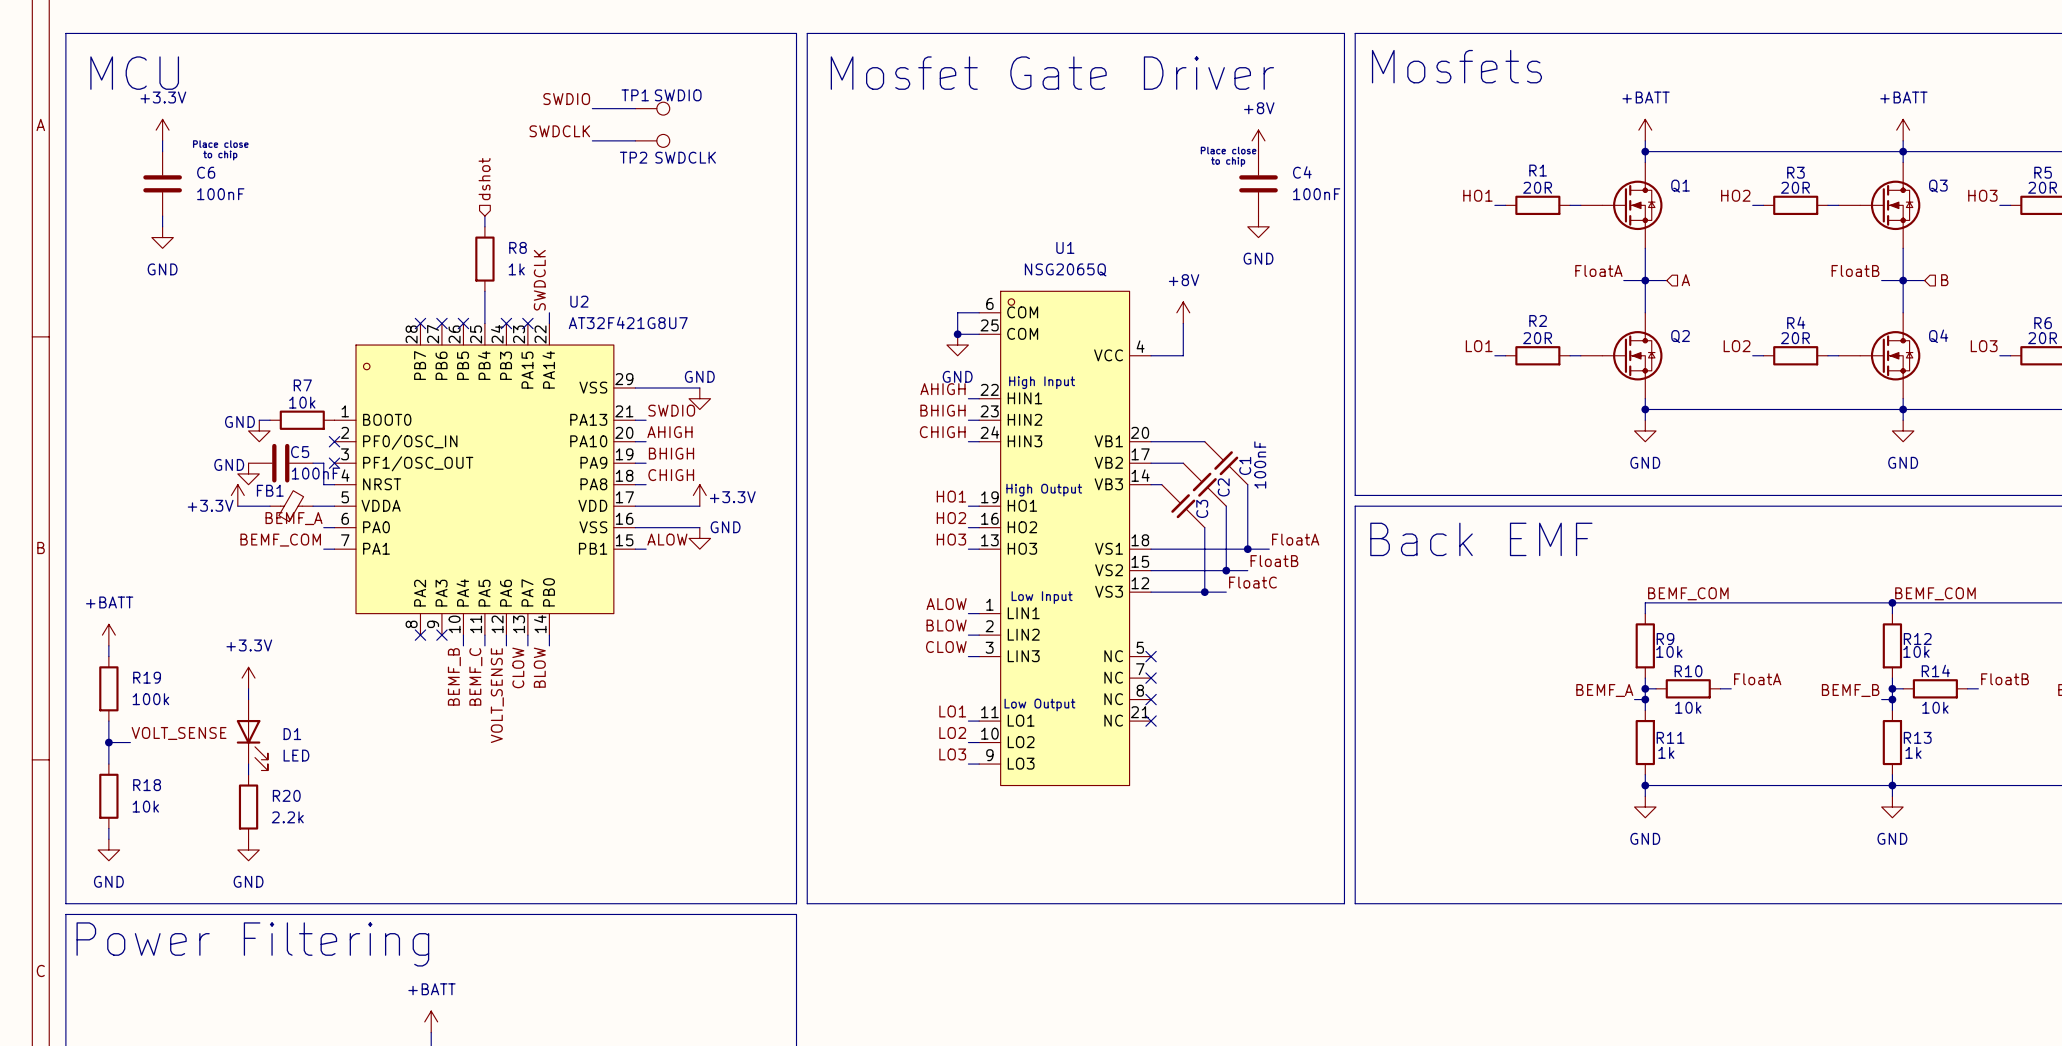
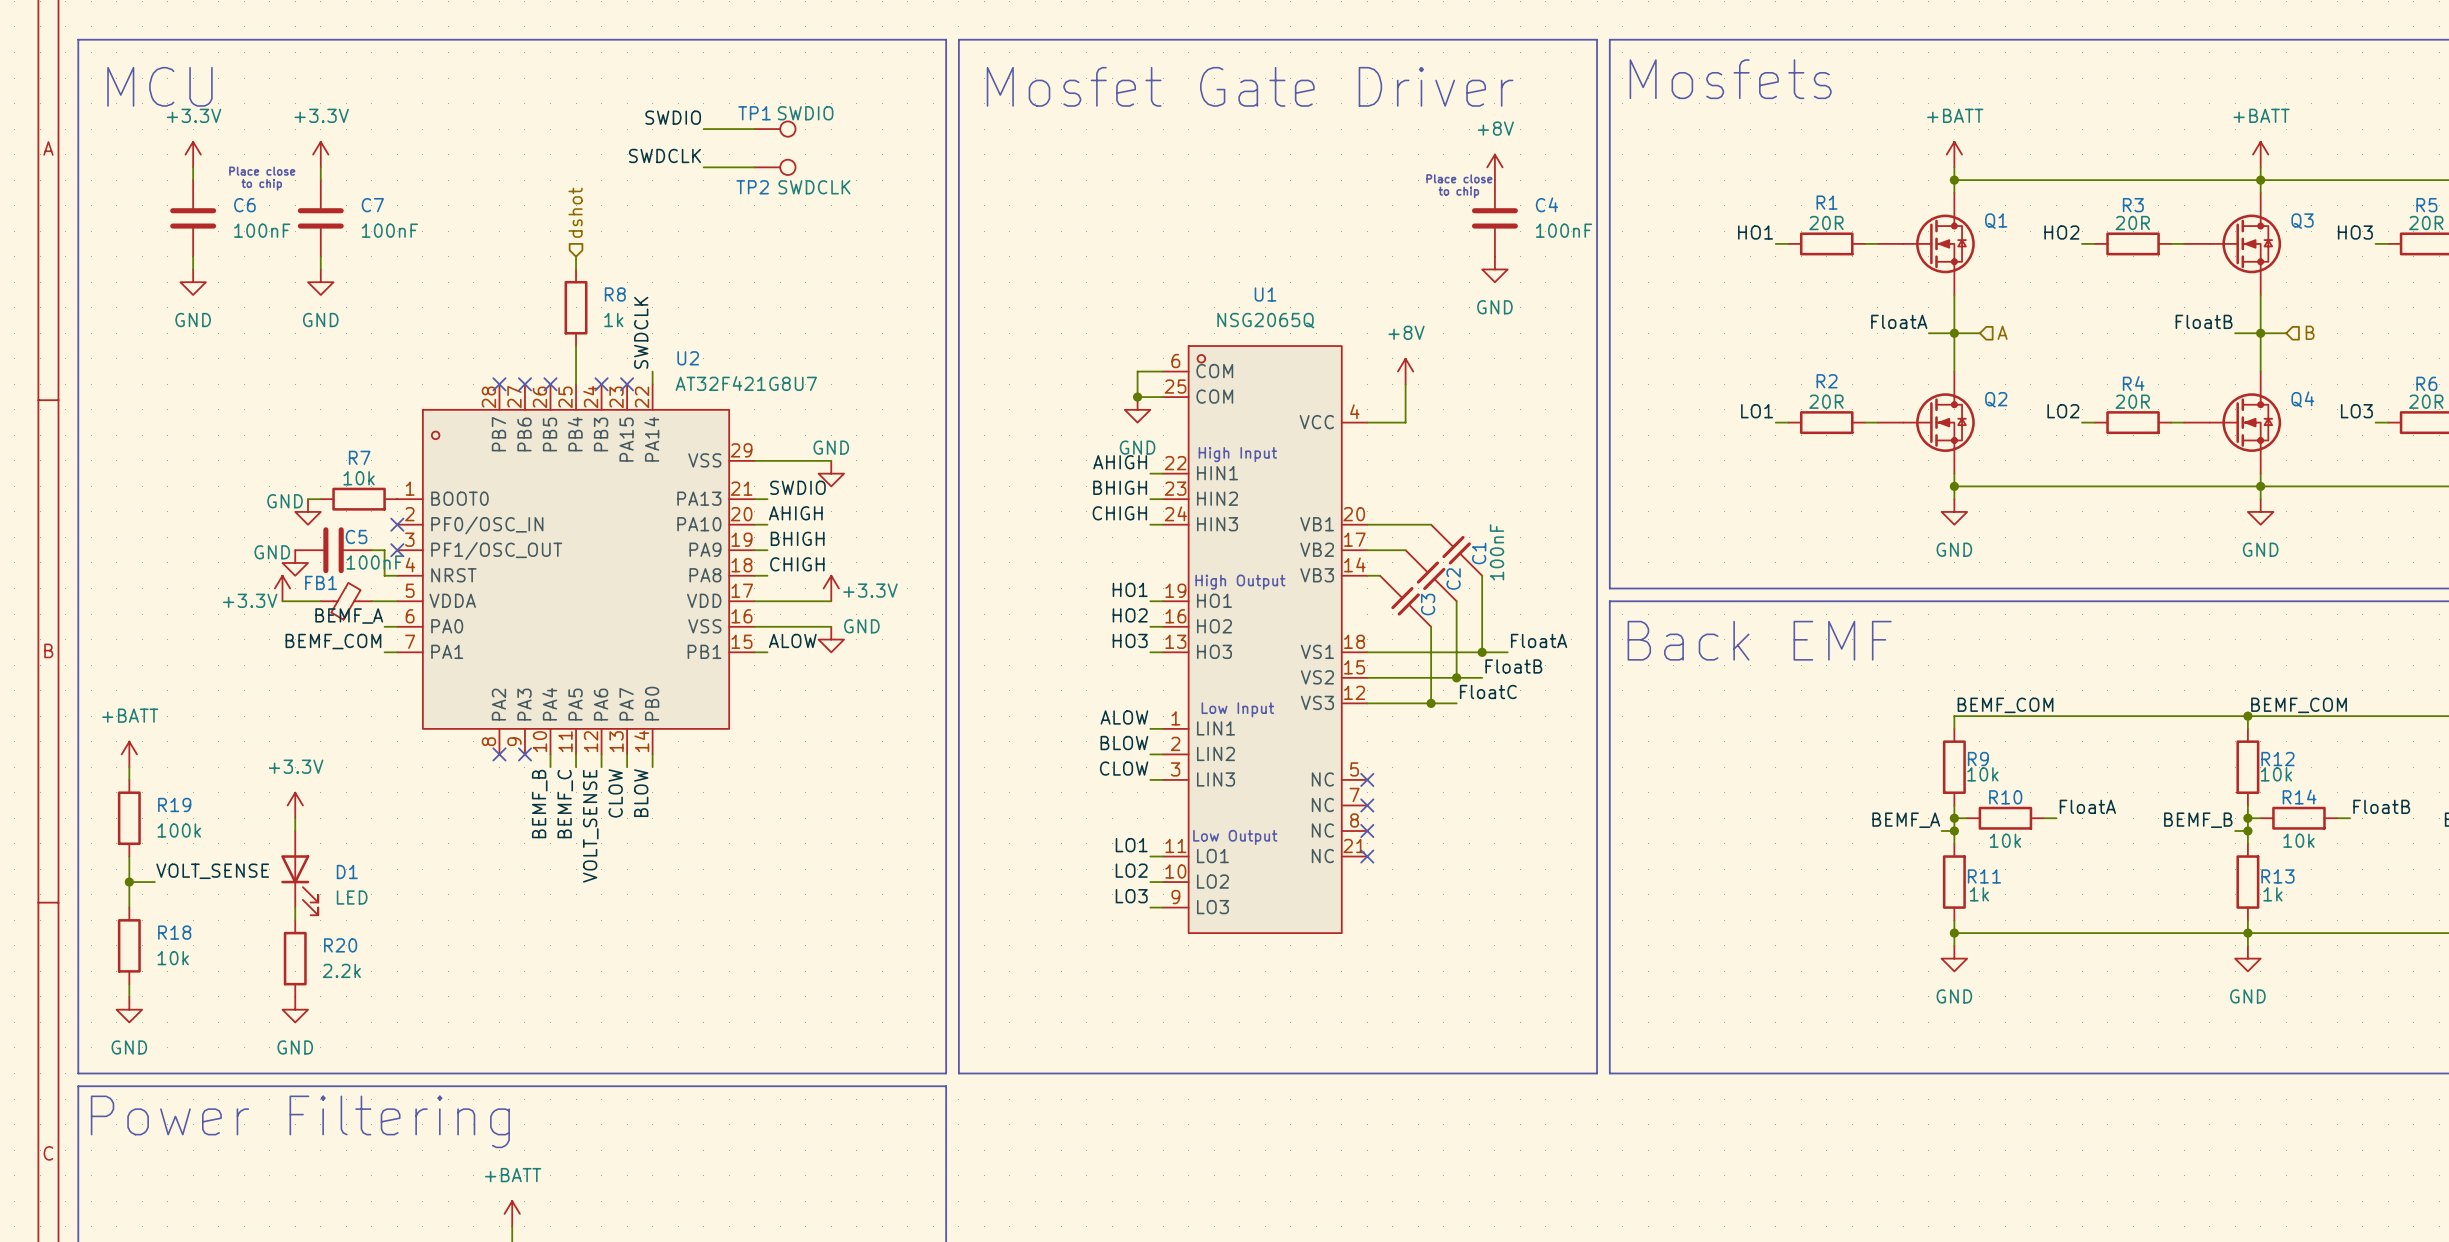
power symbol: none -> +3.3V (320, 154)
wire: none -> (320, 167) (320, 180)
C7: none -> 100nF (320, 218)
wire: none -> (320, 256) (320, 269)
power symbol: none -> GND (320, 282)

